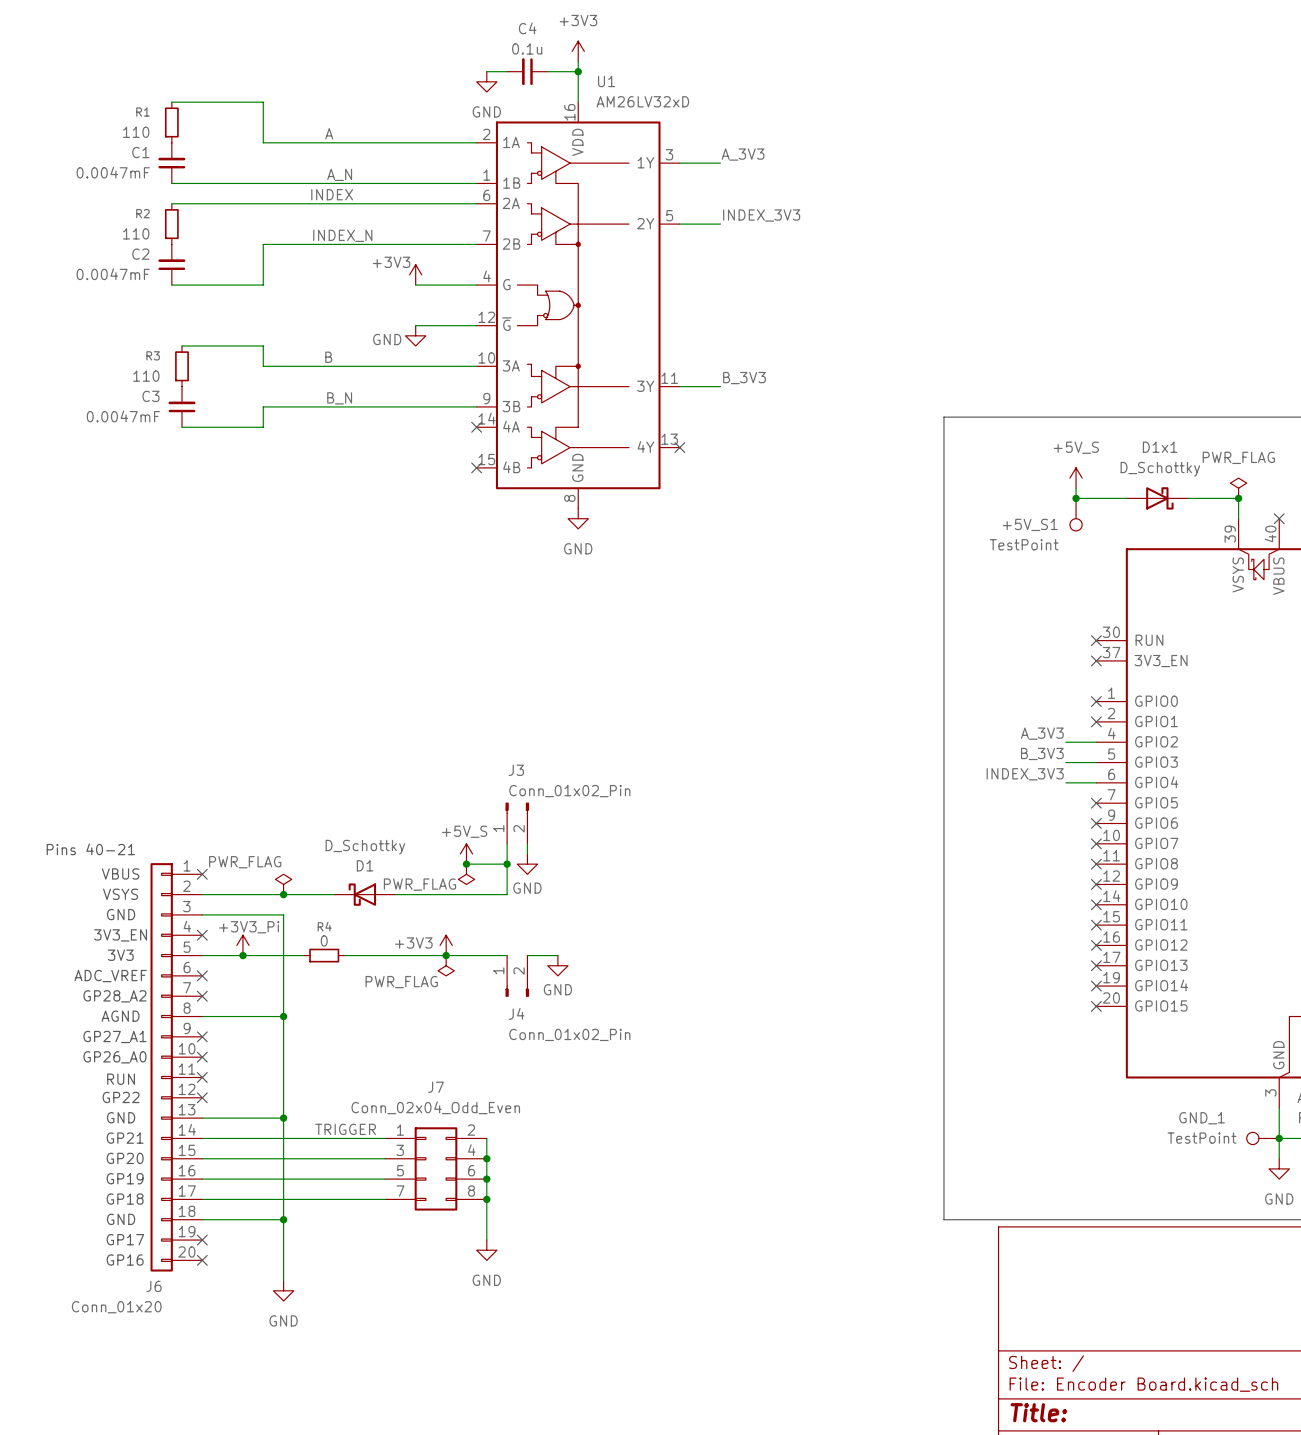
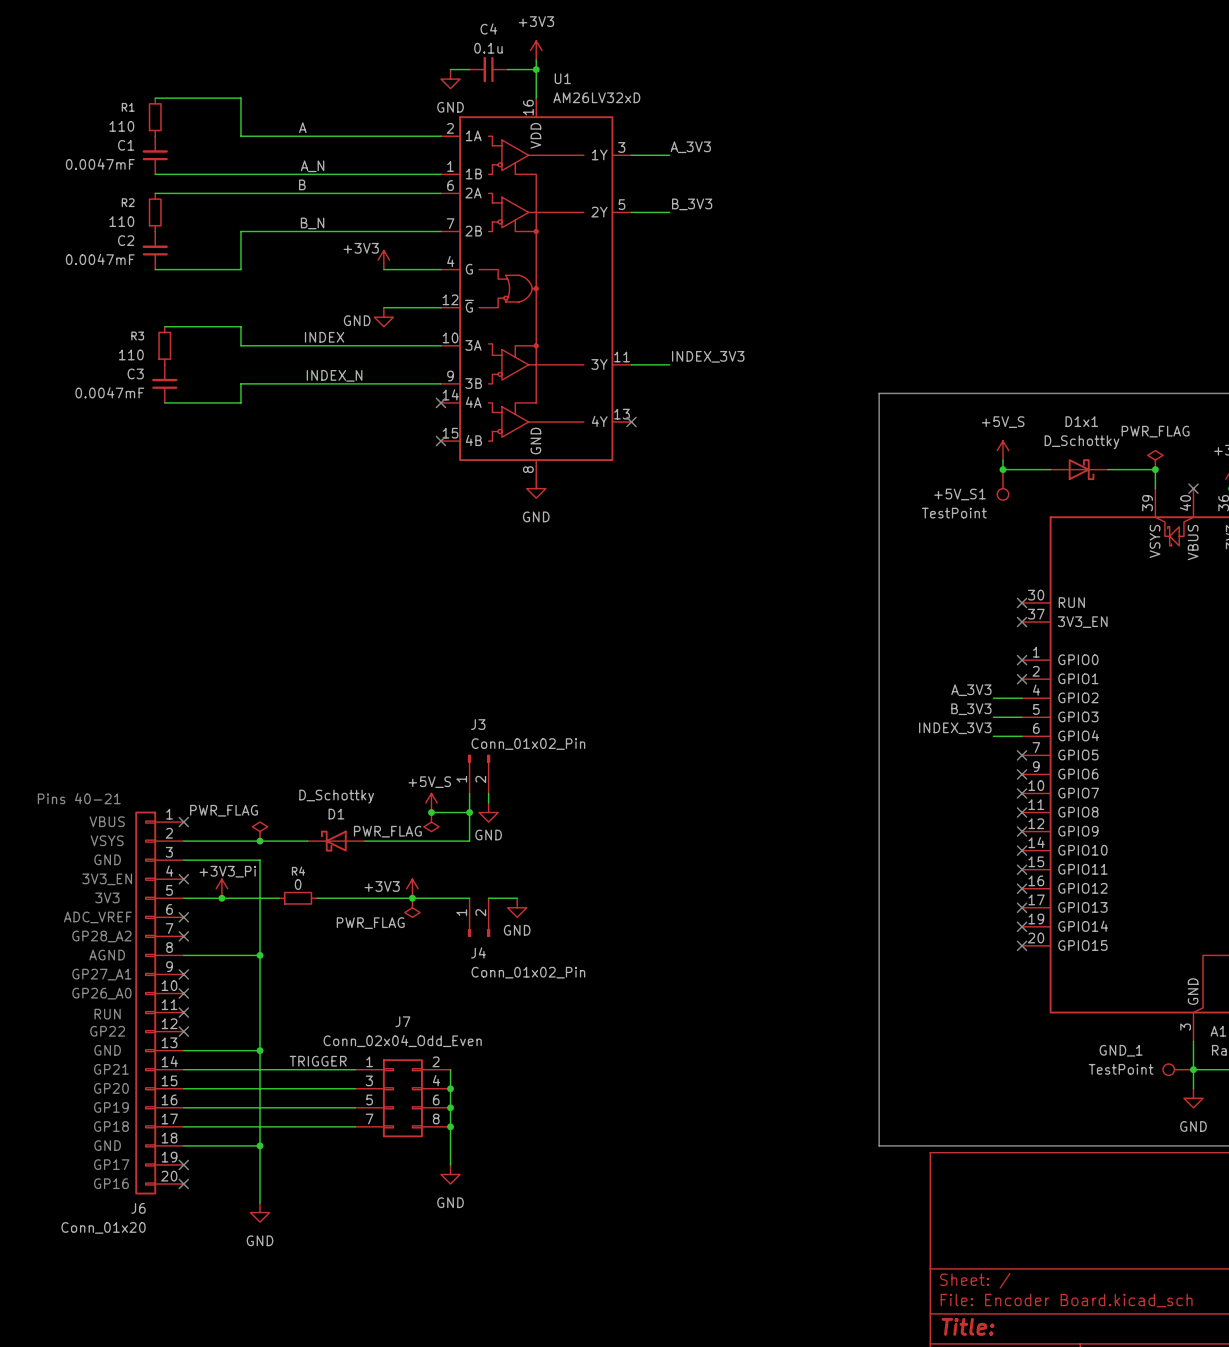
label position: INDEX (332, 194) -> INDEX (324, 337)
label: INDEX_3V3 (761, 215) -> B_3V3 (692, 204)
label position: INDEX_N (342, 235) -> INDEX_N (334, 375)
label position: B (328, 357) -> B (302, 184)
label: B_3V3 (744, 378) -> INDEX_3V3 (708, 356)
label position: B_N (339, 398) -> B_N (312, 223)

